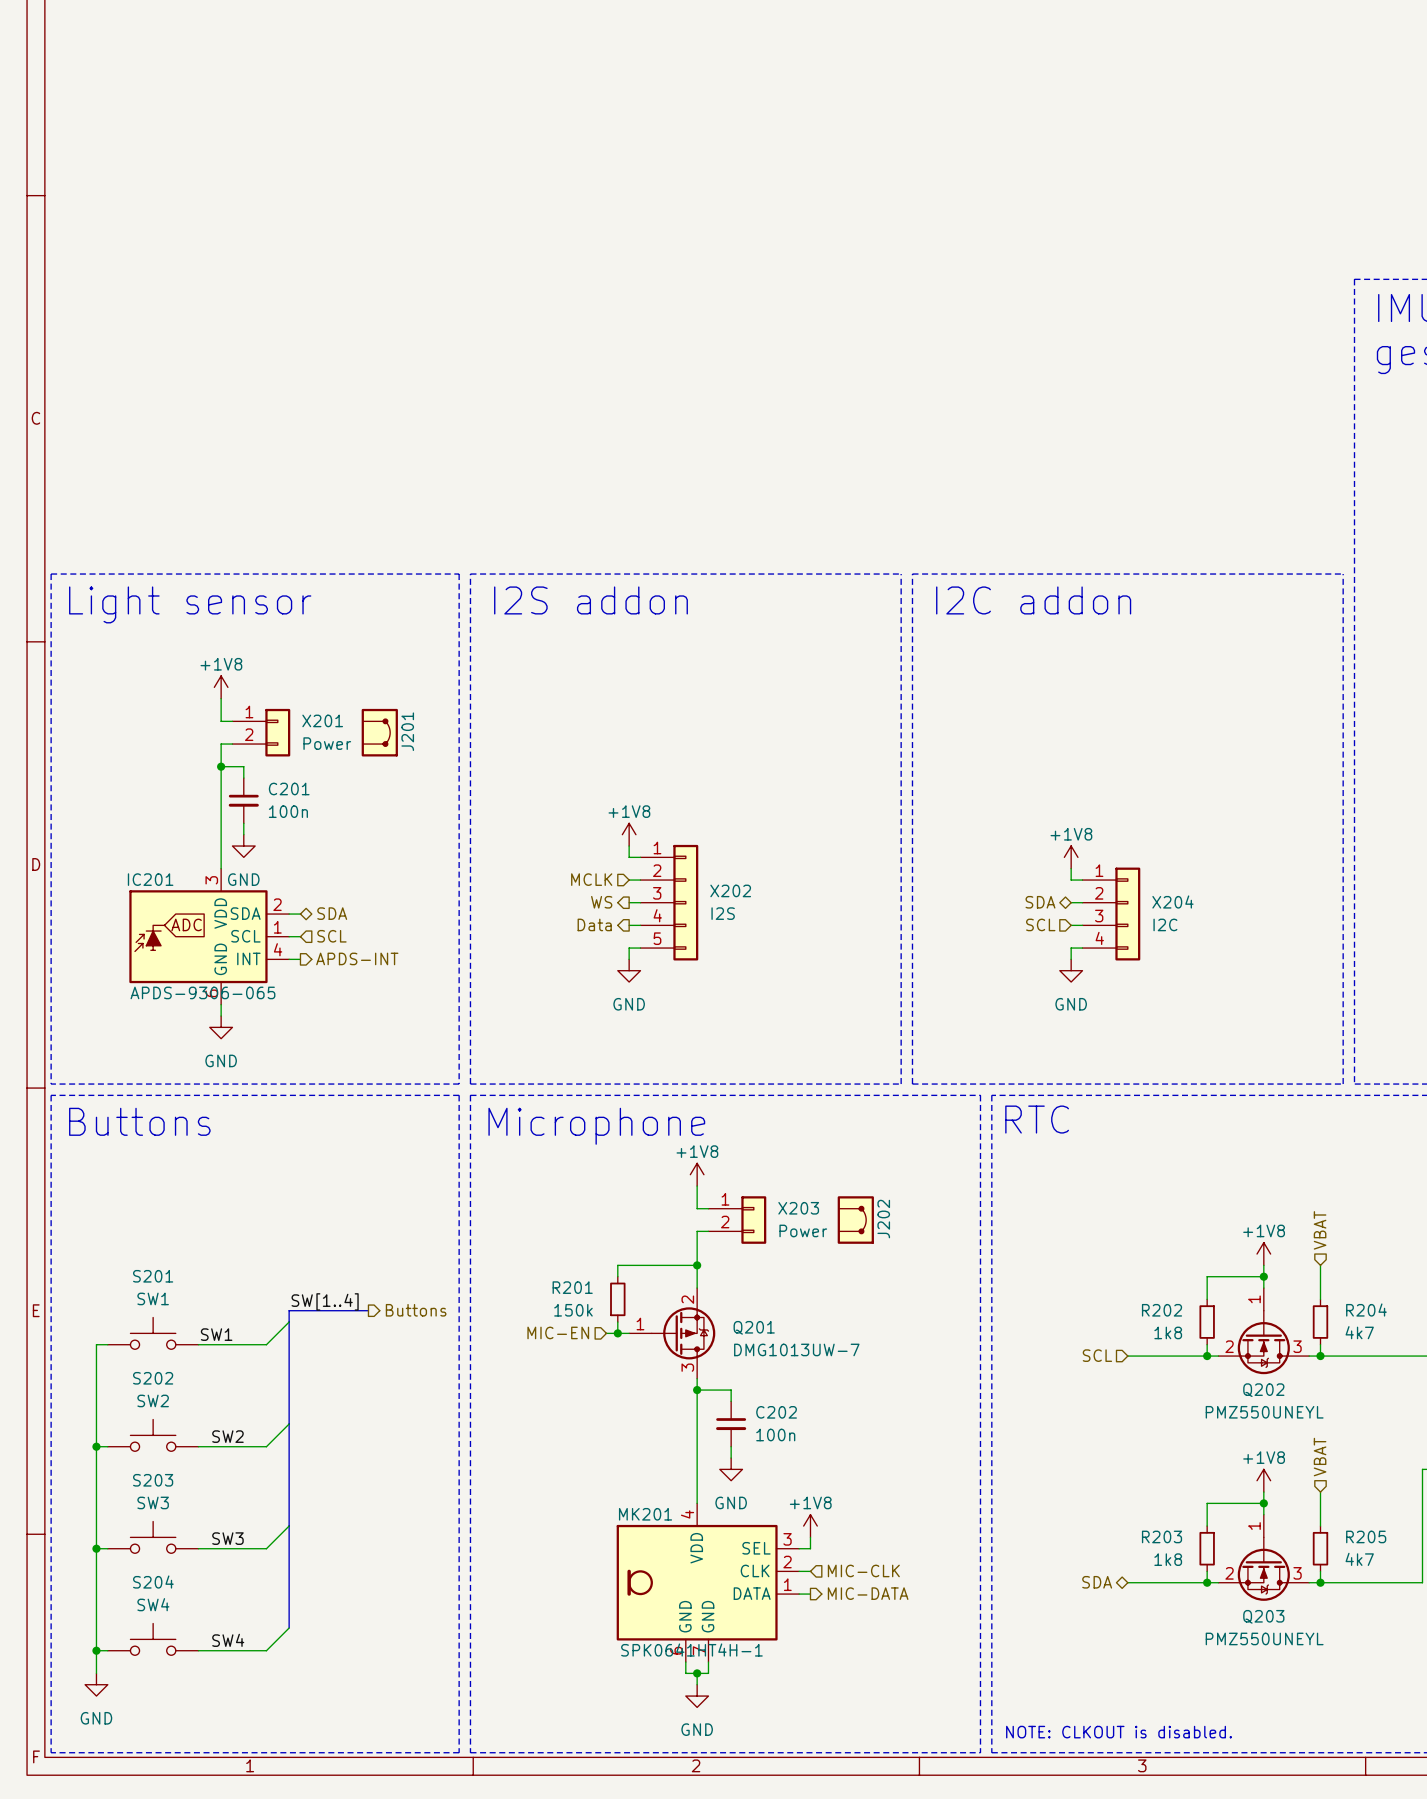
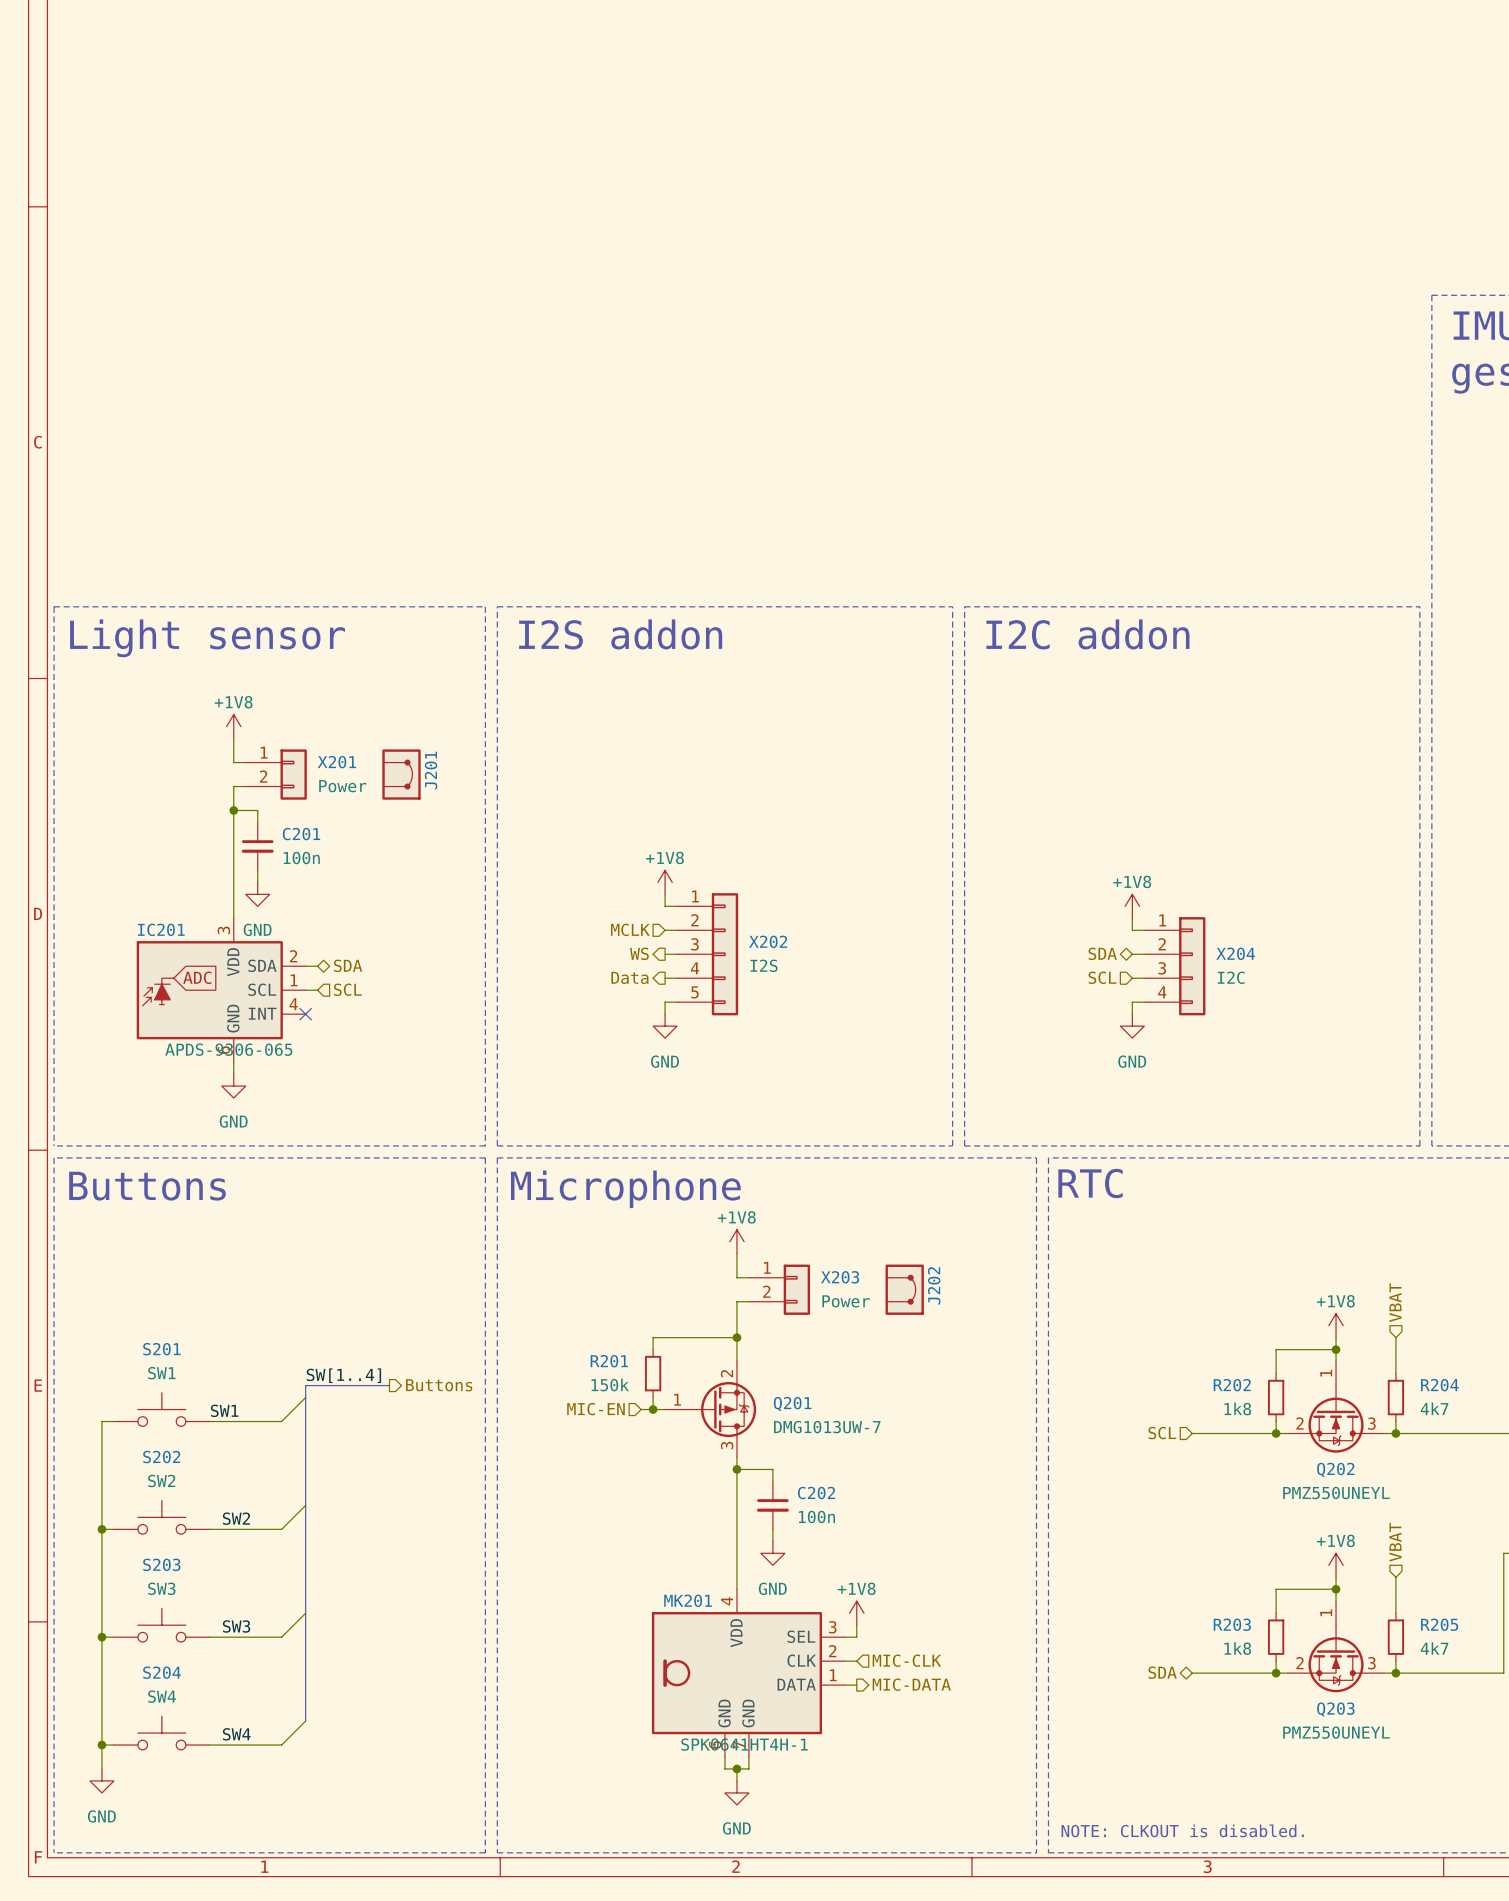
hierarchical label: APDS-INT (357, 958) -> none
wire: (289, 959) (300, 959) -> none
no-connect mark: none -> (305, 1014)

